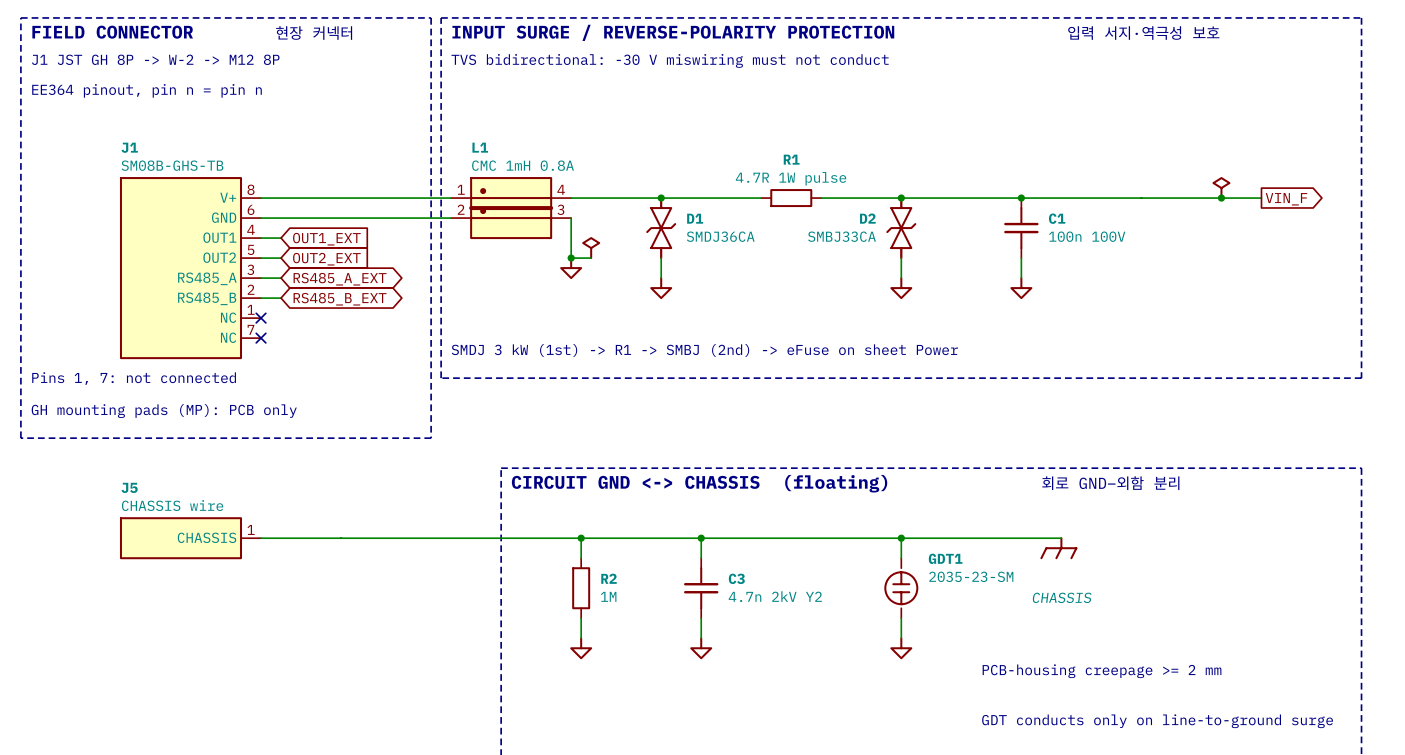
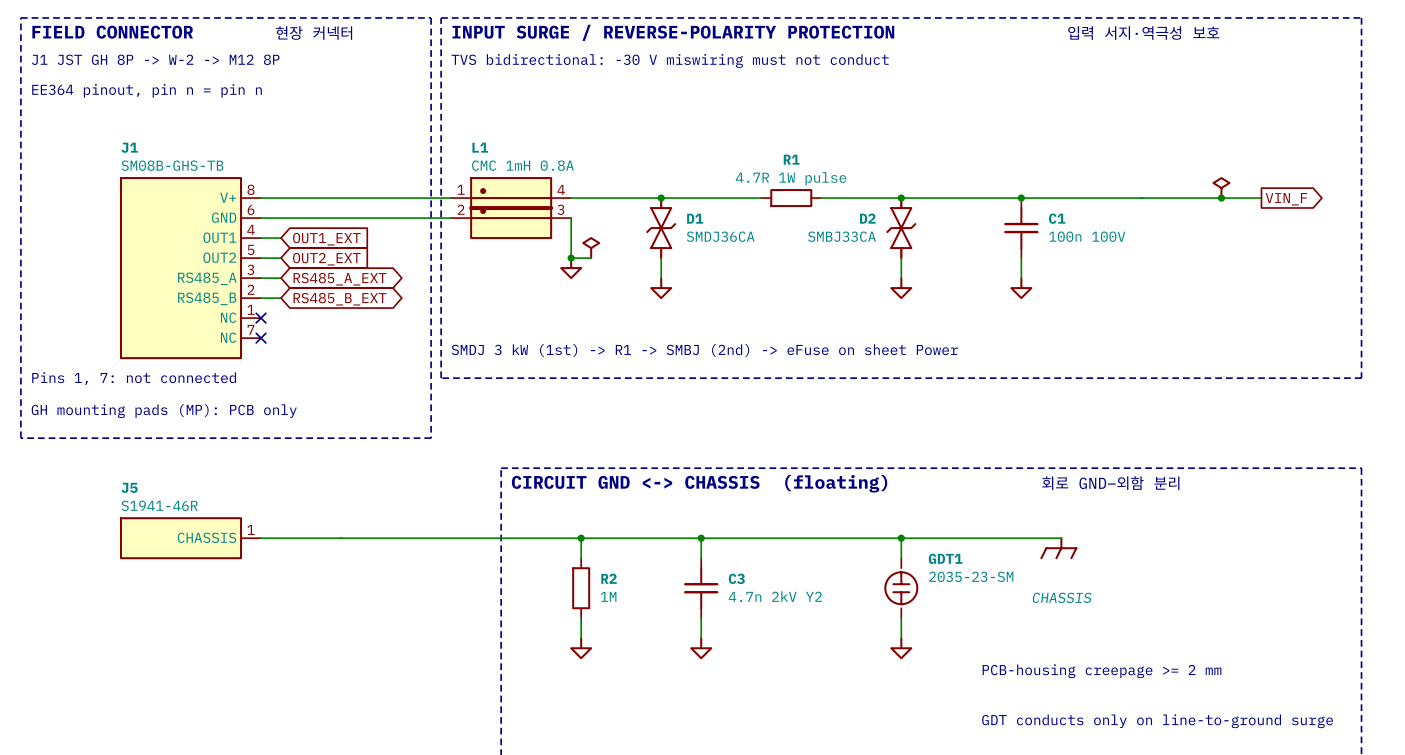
J5 value: CHASSIS wire (172, 505) -> S1941-46R (159, 505)

